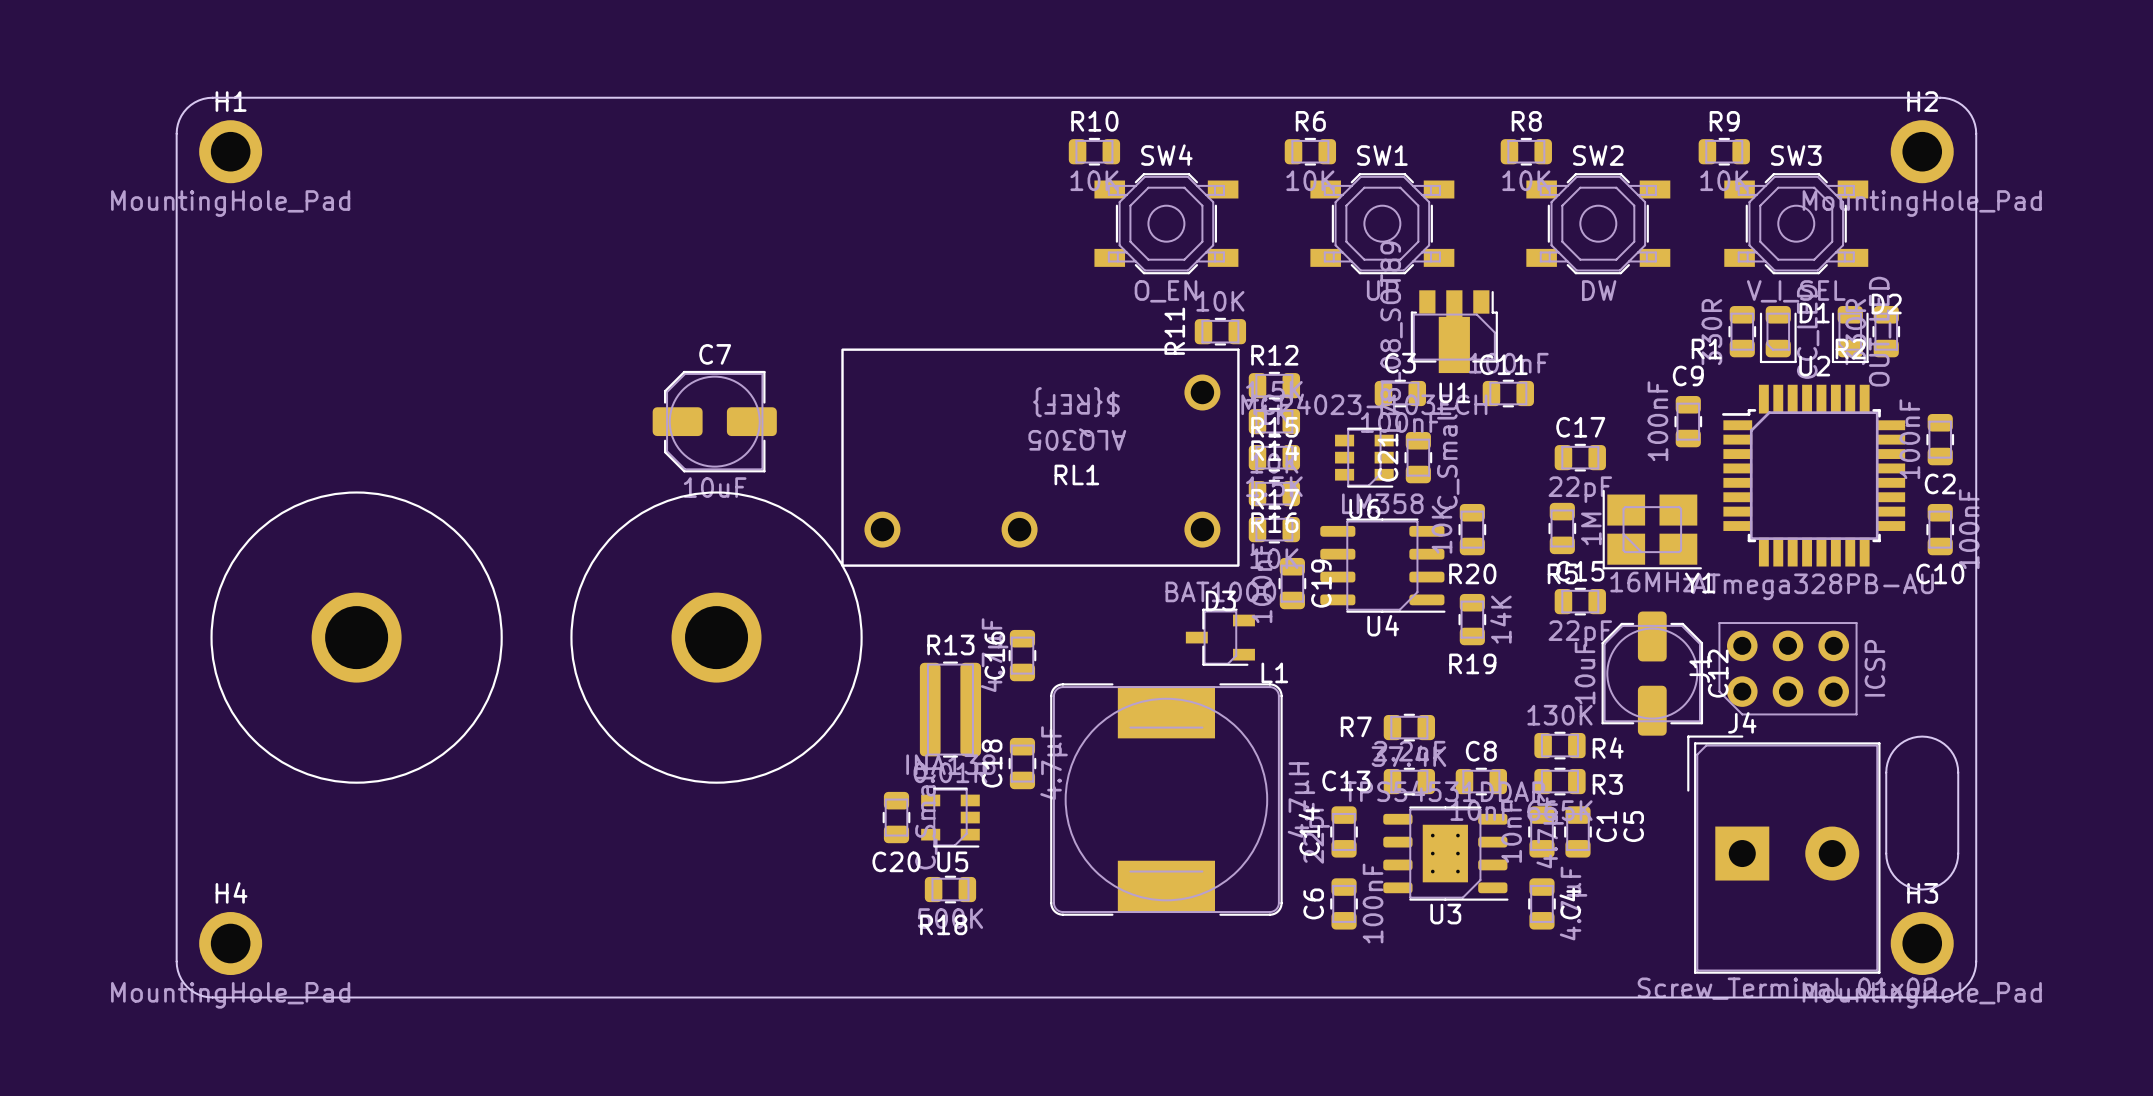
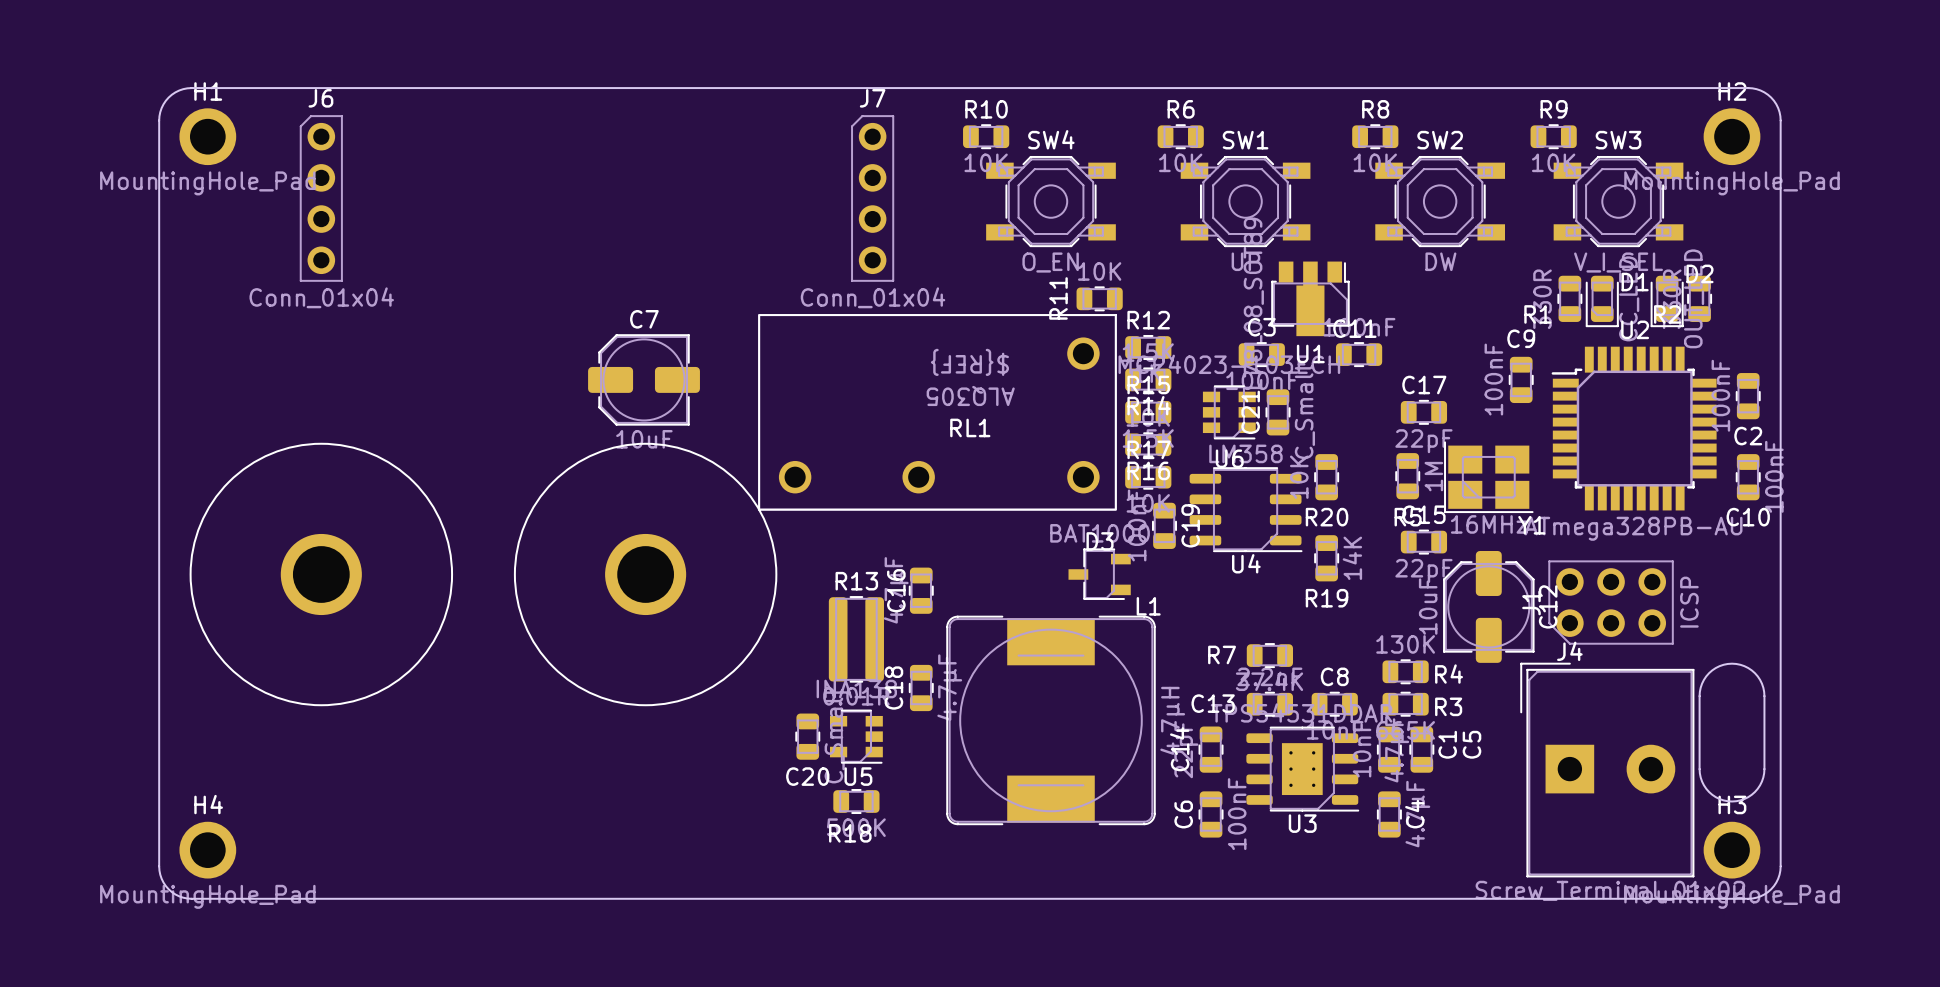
J6: none -> Conn_01x04 (321, 198)
J7: none -> Conn_01x04 (872, 198)

